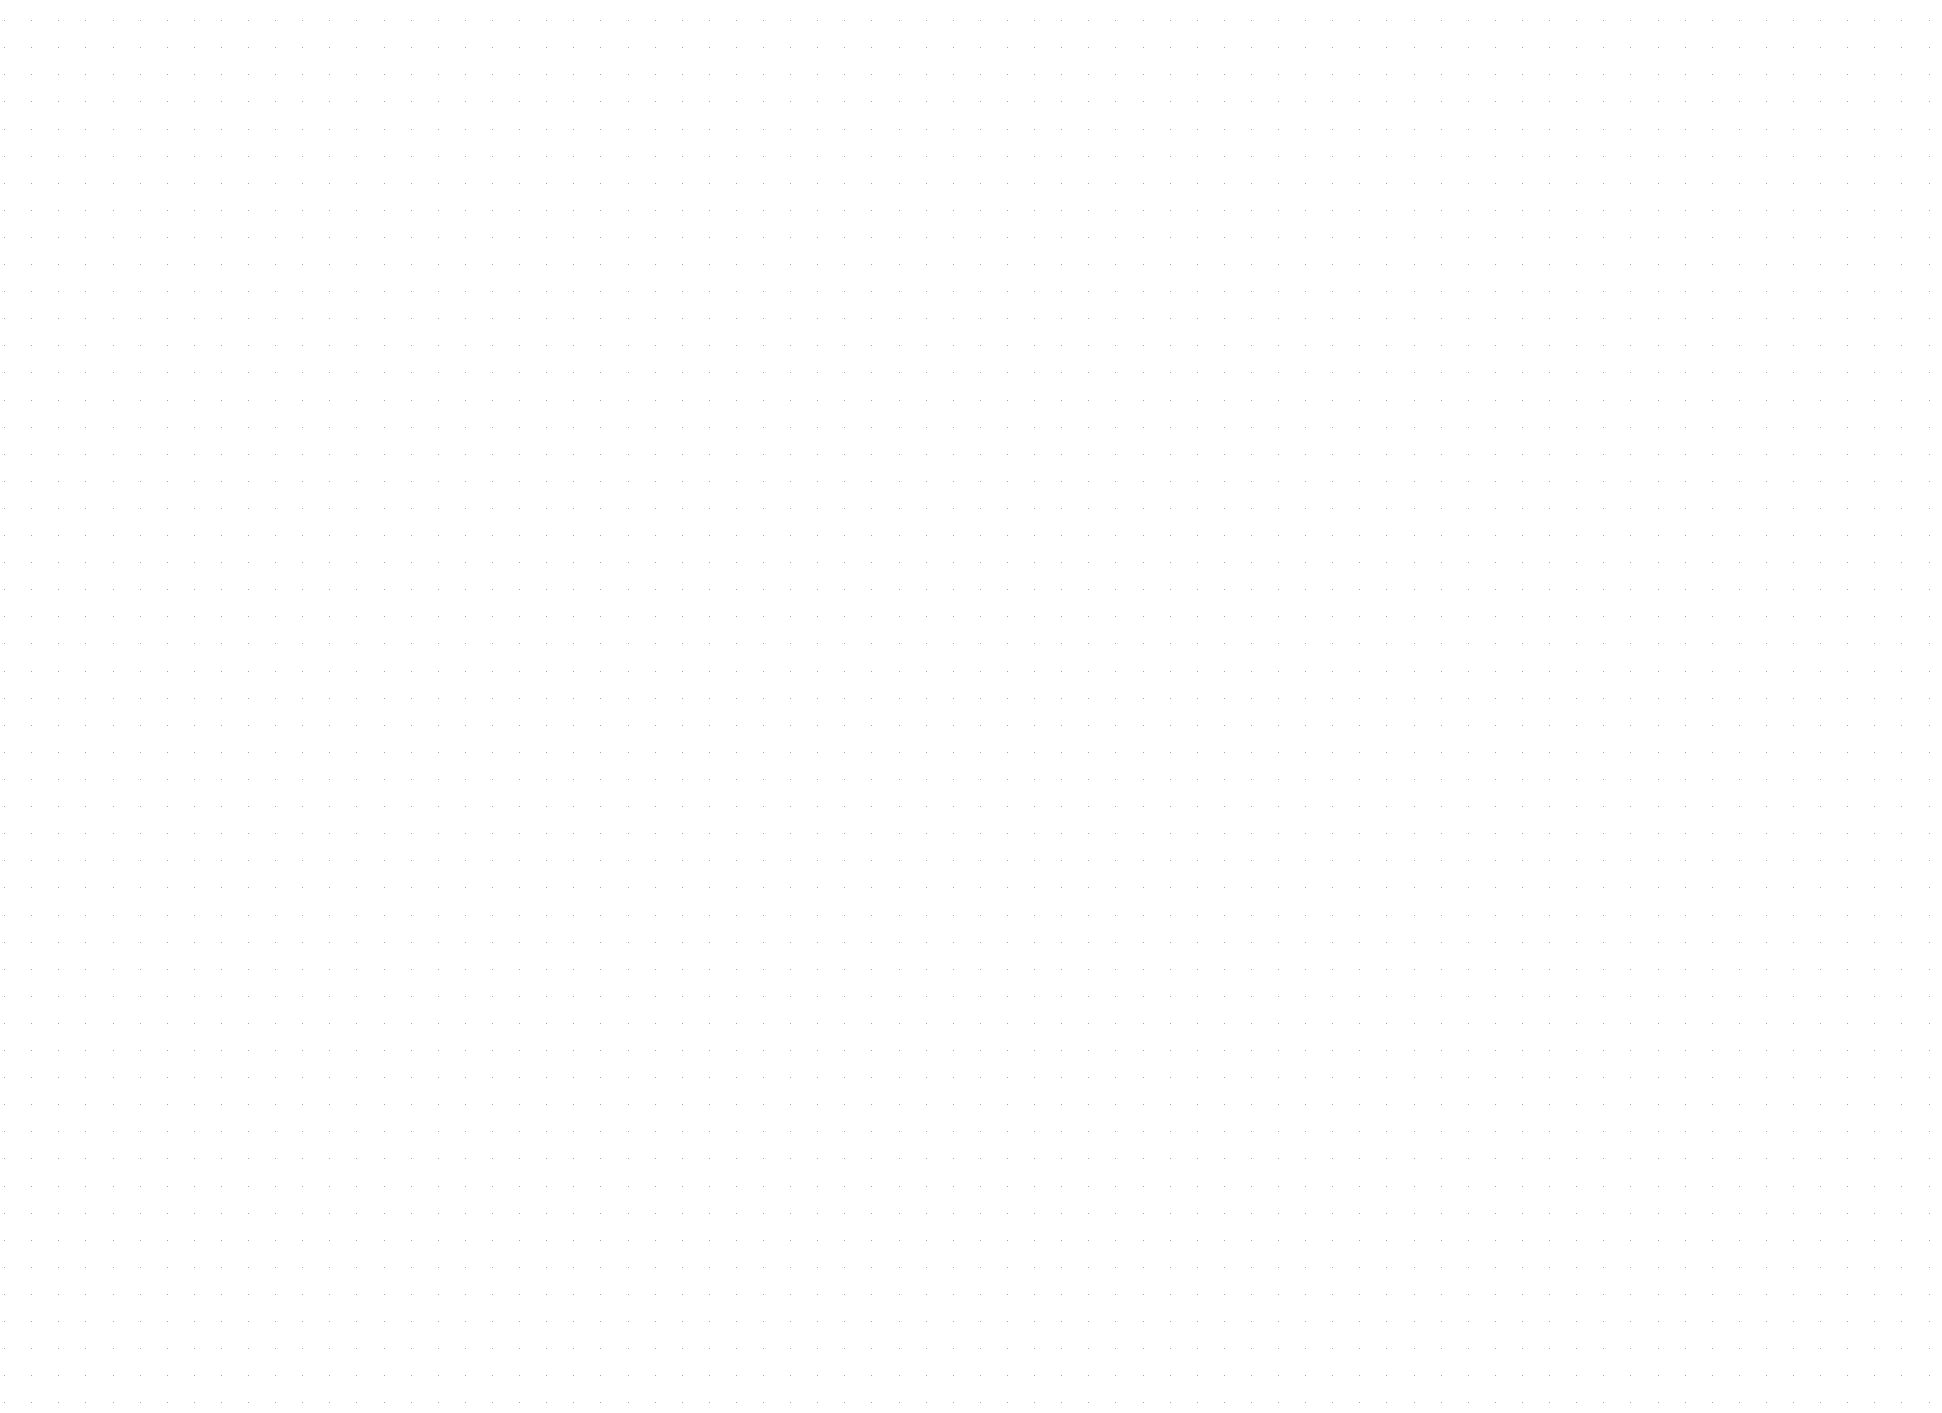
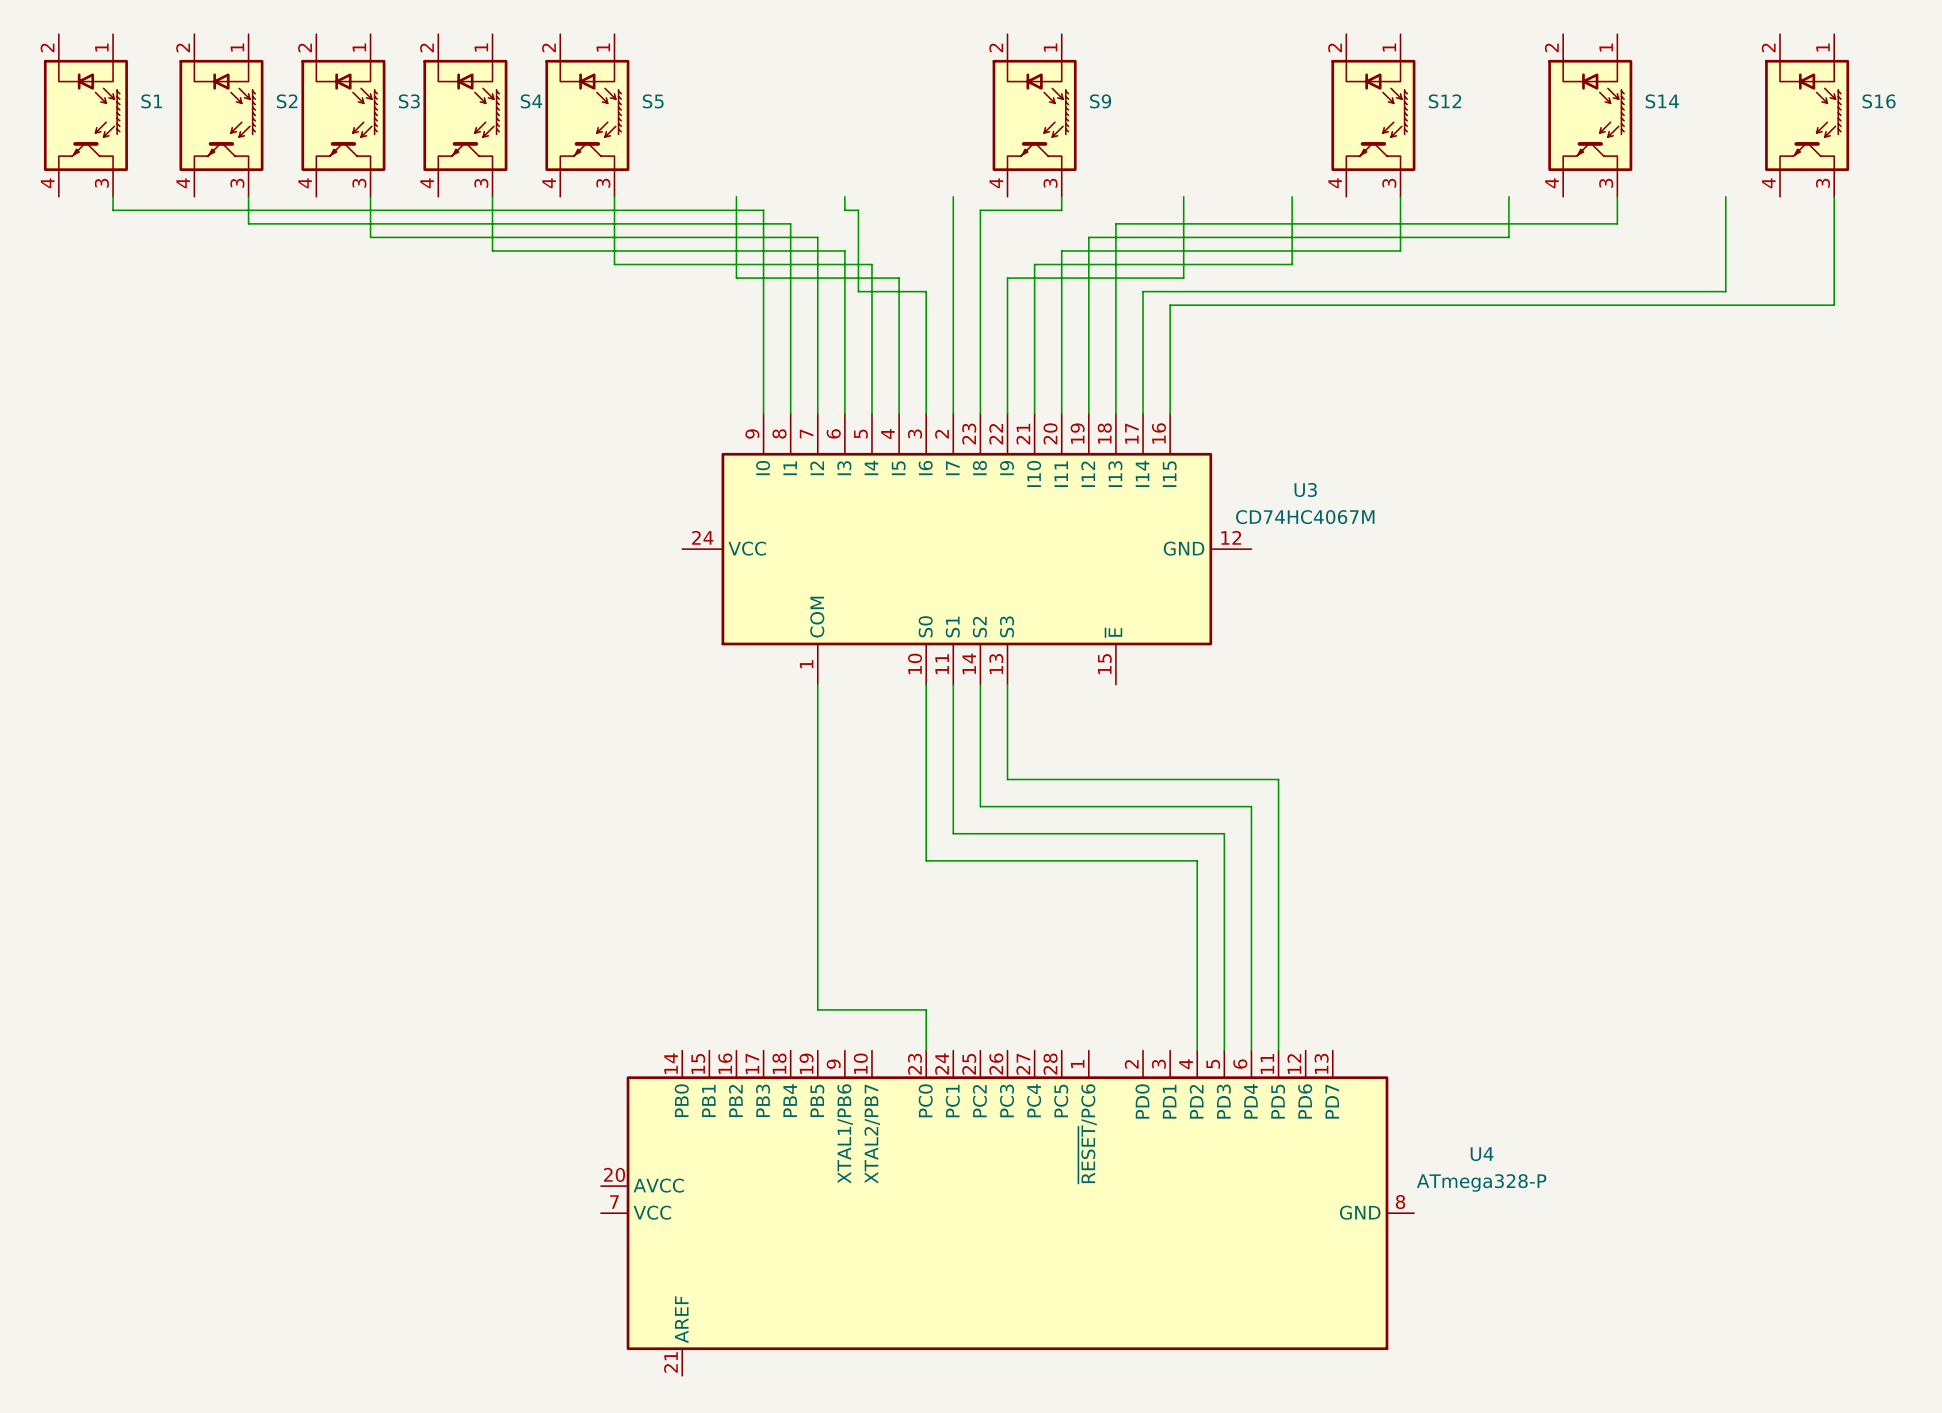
S1: none -> (85, 115)
S2: none -> (221, 115)
S3: none -> (343, 115)
S4: none -> (465, 115)
S5: none -> (587, 115)
S9: none -> (1034, 115)
S12: none -> (1373, 115)
S14: none -> (1590, 115)
S16: none -> (1807, 115)
wire: none -> (113, 196) (113, 210) (763, 210) (763, 413)
wire: none -> (248, 196) (248, 223) (790, 223) (790, 413)
wire: none -> (370, 196) (370, 237) (817, 237) (817, 413)
wire: none -> (492, 196) (492, 250) (844, 250) (844, 413)
wire: none -> (614, 196) (614, 264) (871, 264) (871, 413)
wire: none -> (736, 196) (736, 278) (899, 278) (899, 413)
wire: none -> (844, 196) (844, 210) (858, 210) (858, 291) (926, 291) (926, 413)
wire: none -> (953, 196) (953, 413)
wire: none -> (1061, 196) (1061, 210) (980, 210) (980, 413)
wire: none -> (1183, 196) (1183, 278) (1007, 278) (1007, 413)
wire: none -> (1292, 196) (1292, 264) (1034, 264) (1034, 413)
wire: none -> (1400, 196) (1400, 250) (1061, 250) (1061, 413)
wire: none -> (1508, 196) (1508, 237) (1088, 237) (1088, 413)
wire: none -> (1617, 196) (1617, 223) (1115, 223) (1115, 413)
wire: none -> (1725, 196) (1725, 291) (1143, 291) (1143, 413)
wire: none -> (1834, 196) (1834, 305) (1170, 305) (1170, 413)
U3: none -> CD74HC4067M (966, 549)
wire: none -> (817, 684) (817, 1009) (926, 1009) (926, 1050)
wire: none -> (926, 684) (926, 860) (1197, 860) (1197, 1050)
wire: none -> (953, 684) (953, 833) (1224, 833) (1224, 1050)
wire: none -> (980, 684) (980, 806) (1251, 806) (1251, 1050)
wire: none -> (1007, 684) (1007, 779) (1278, 779) (1278, 1050)
U4: none -> ATmega328-P (1007, 1213)

